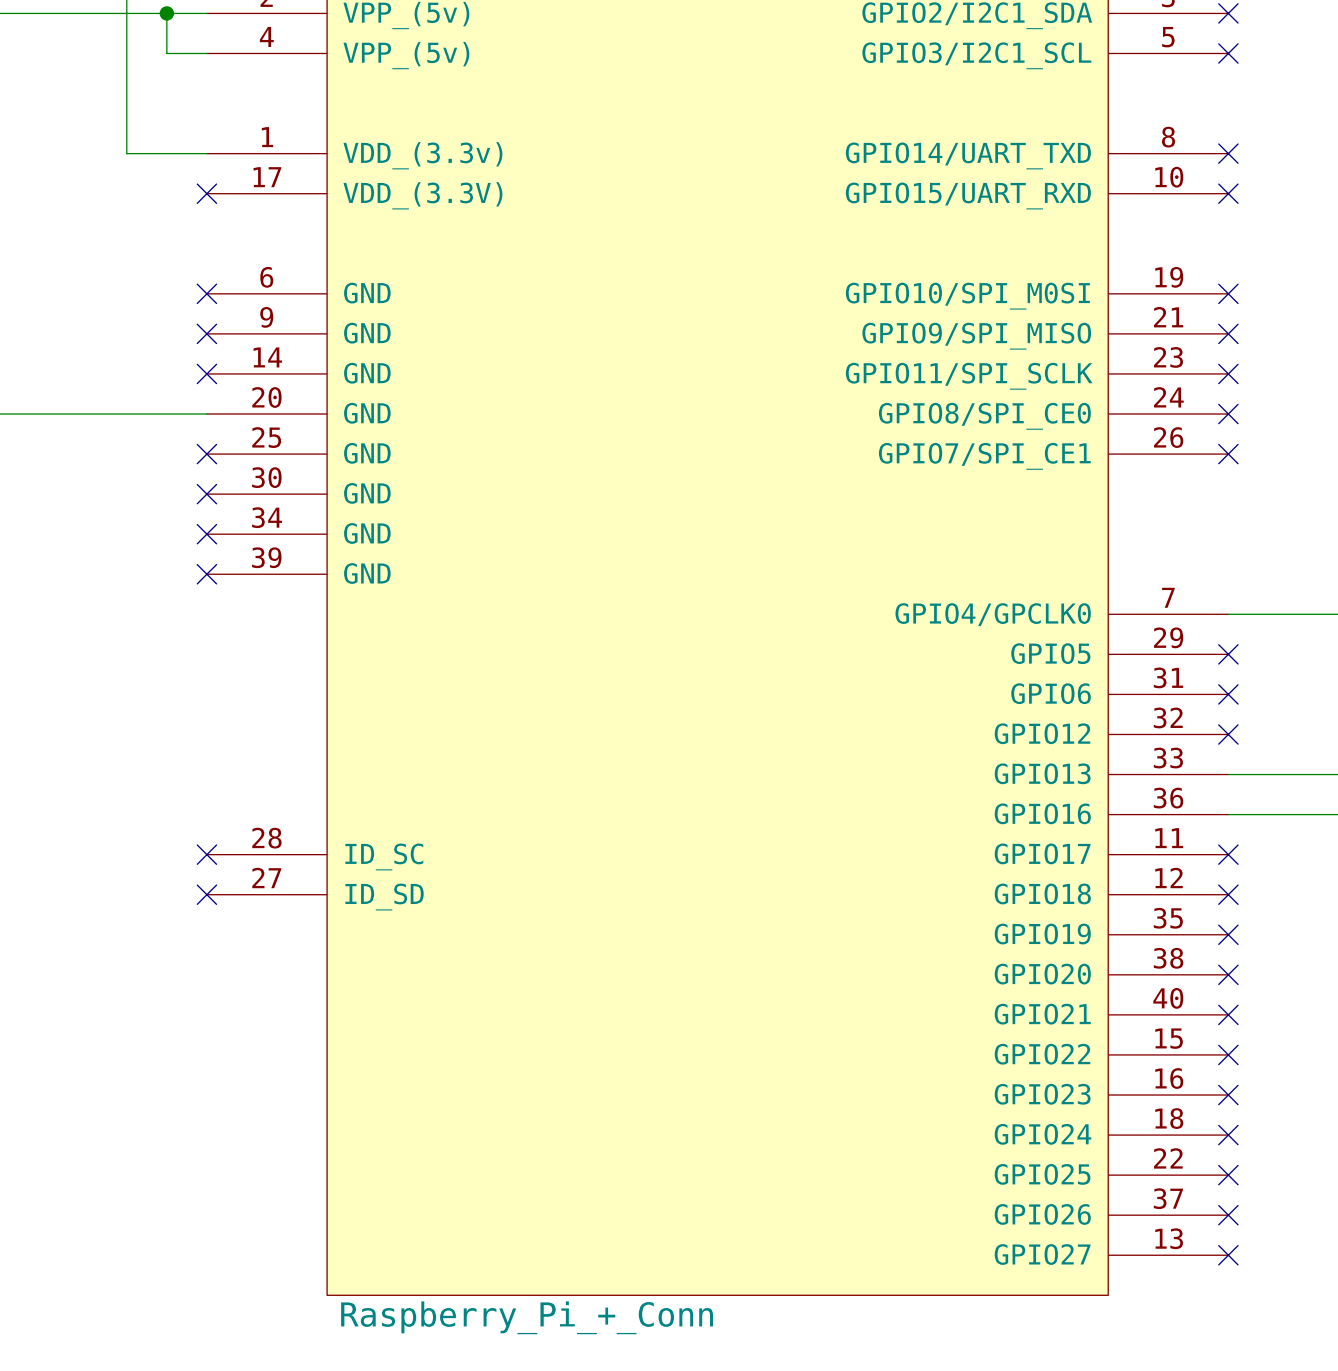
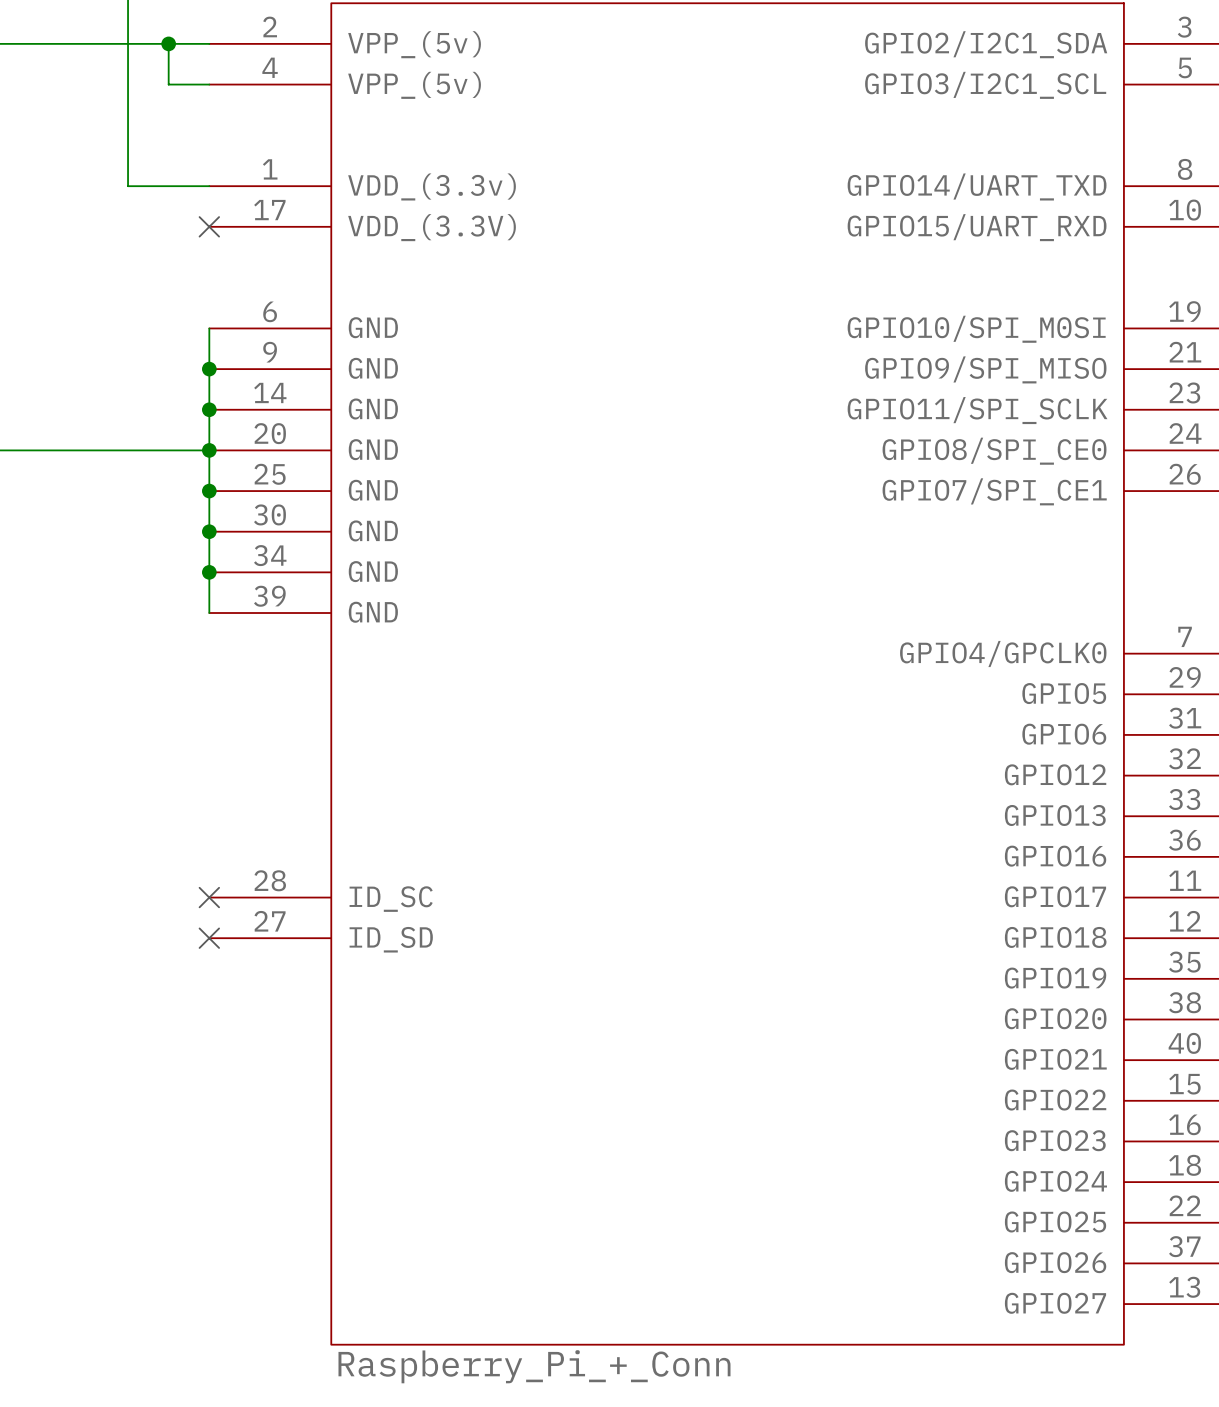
wire: none -> (209, 328) (209, 613)
no-connect mark: (206, 293) -> none
no-connect mark: (206, 333) -> none
junction: none -> (209, 369)
no-connect mark: (206, 373) -> none
junction: none -> (209, 409)
junction: none -> (209, 450)
no-connect mark: (206, 454) -> none
junction: none -> (209, 491)
no-connect mark: (206, 494) -> none
junction: none -> (209, 531)
no-connect mark: (206, 534) -> none
junction: none -> (209, 572)
no-connect mark: (206, 574) -> none

